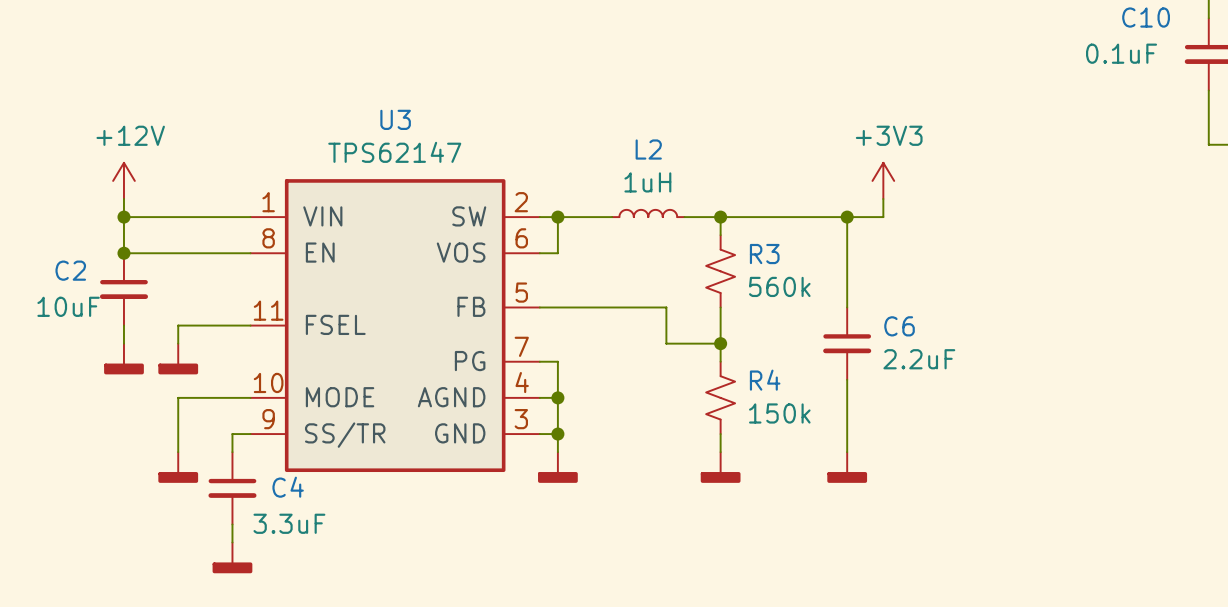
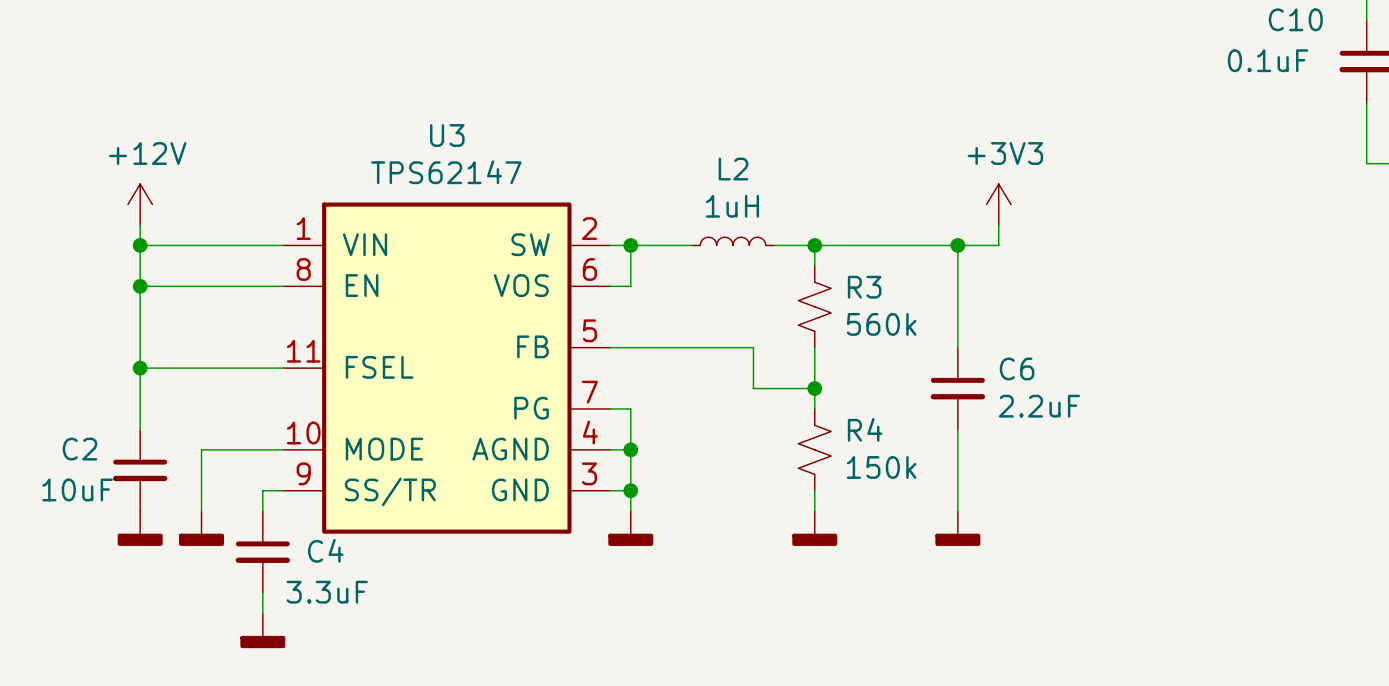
C2 position: (123, 289) -> (140, 470)
junction: none -> (140, 368)
wire: (178, 325) (178, 343) -> (201, 368) (140, 368) (140, 286)
power symbol: (123, 359) -> none
power symbol: (178, 359) -> none
power symbol: none -> (140, 528)

